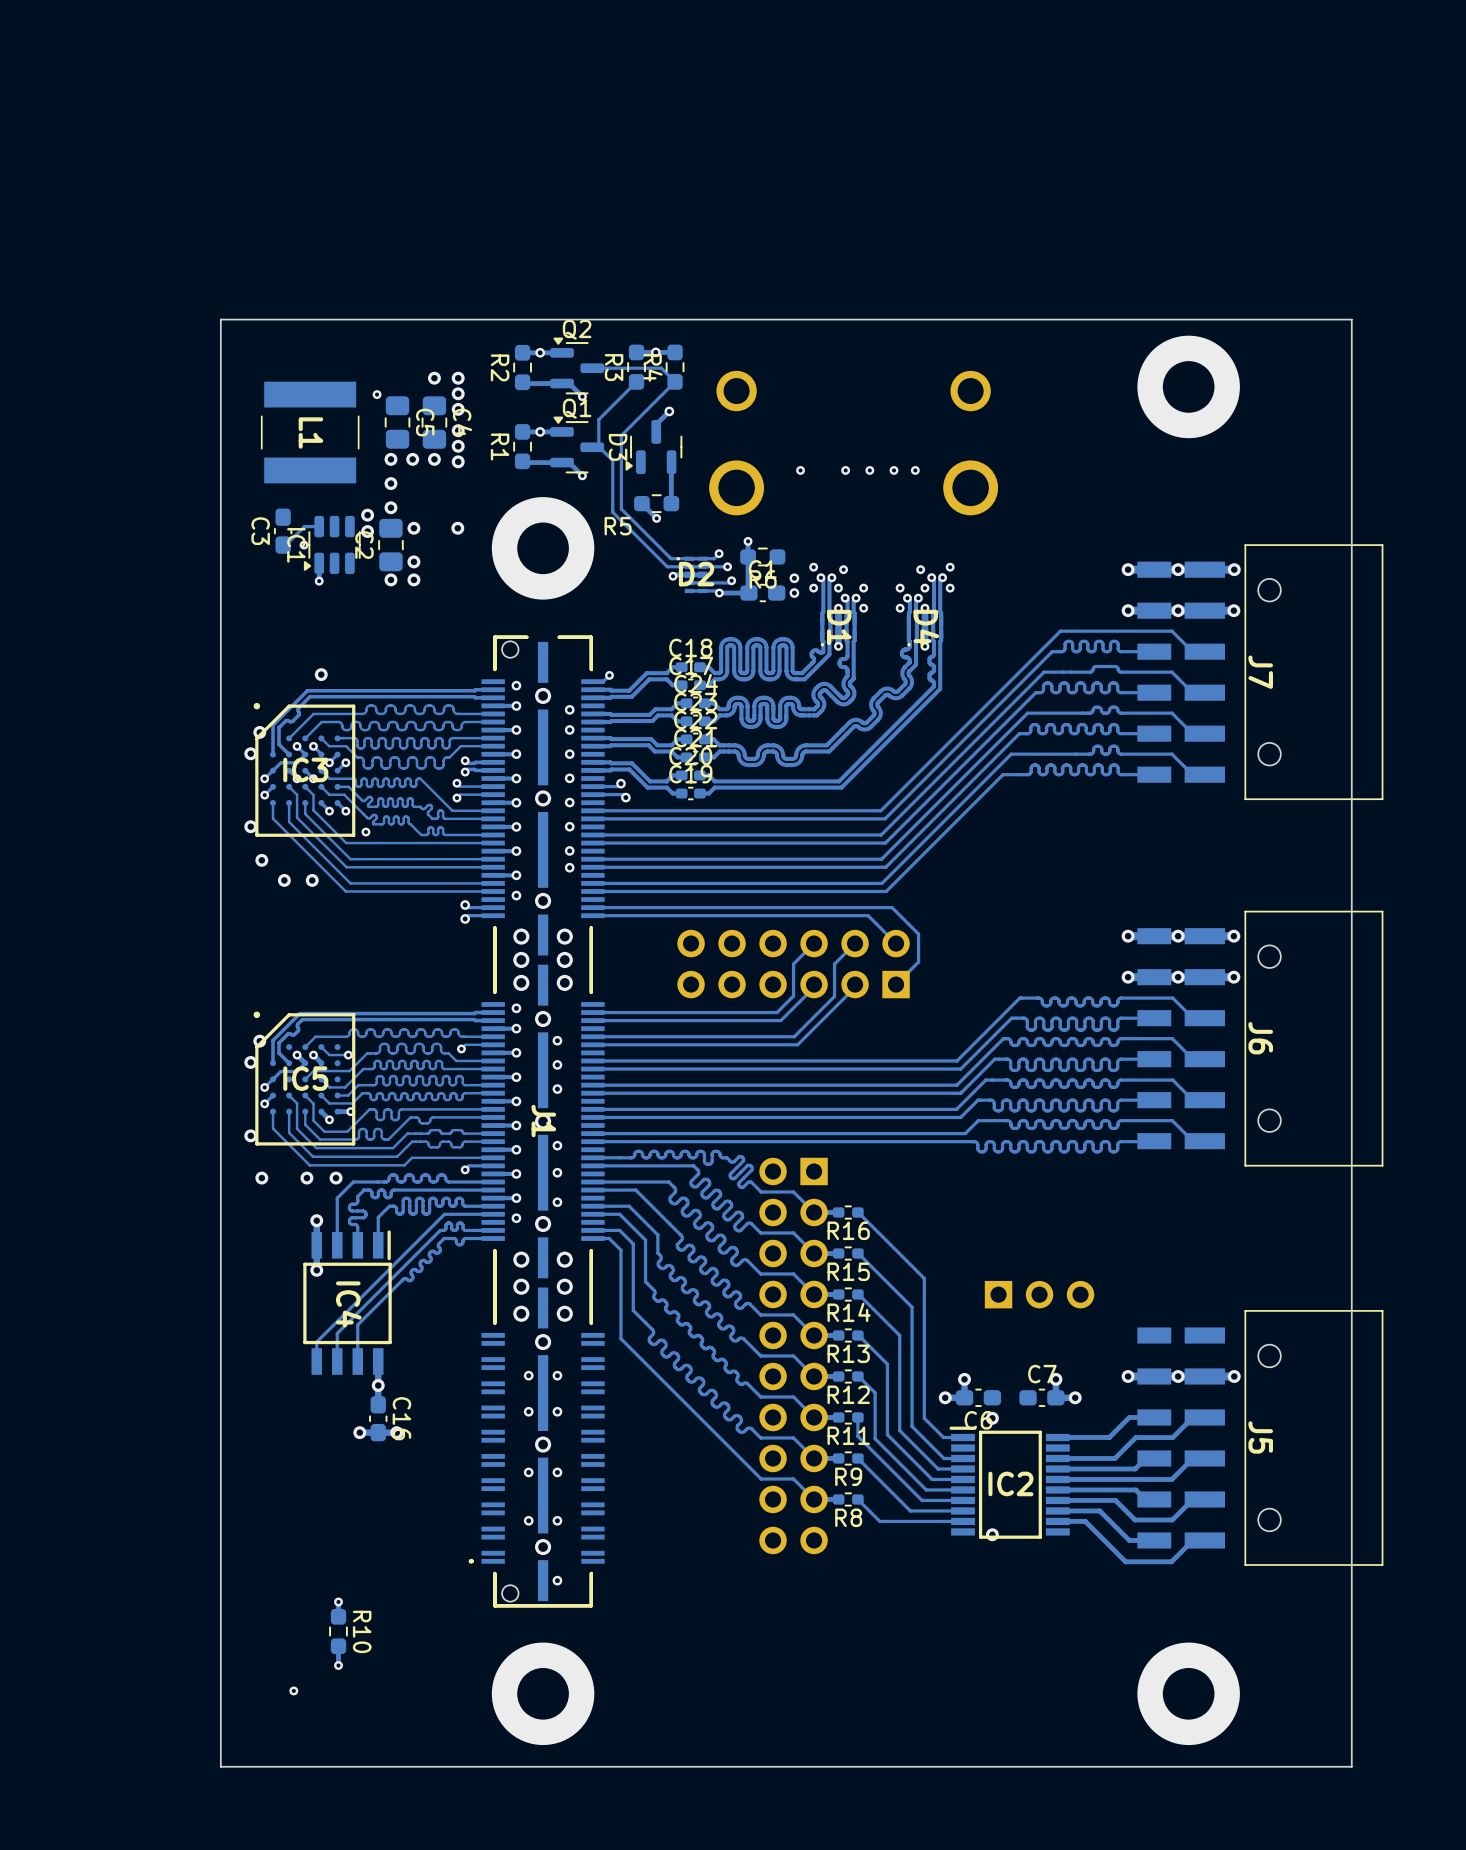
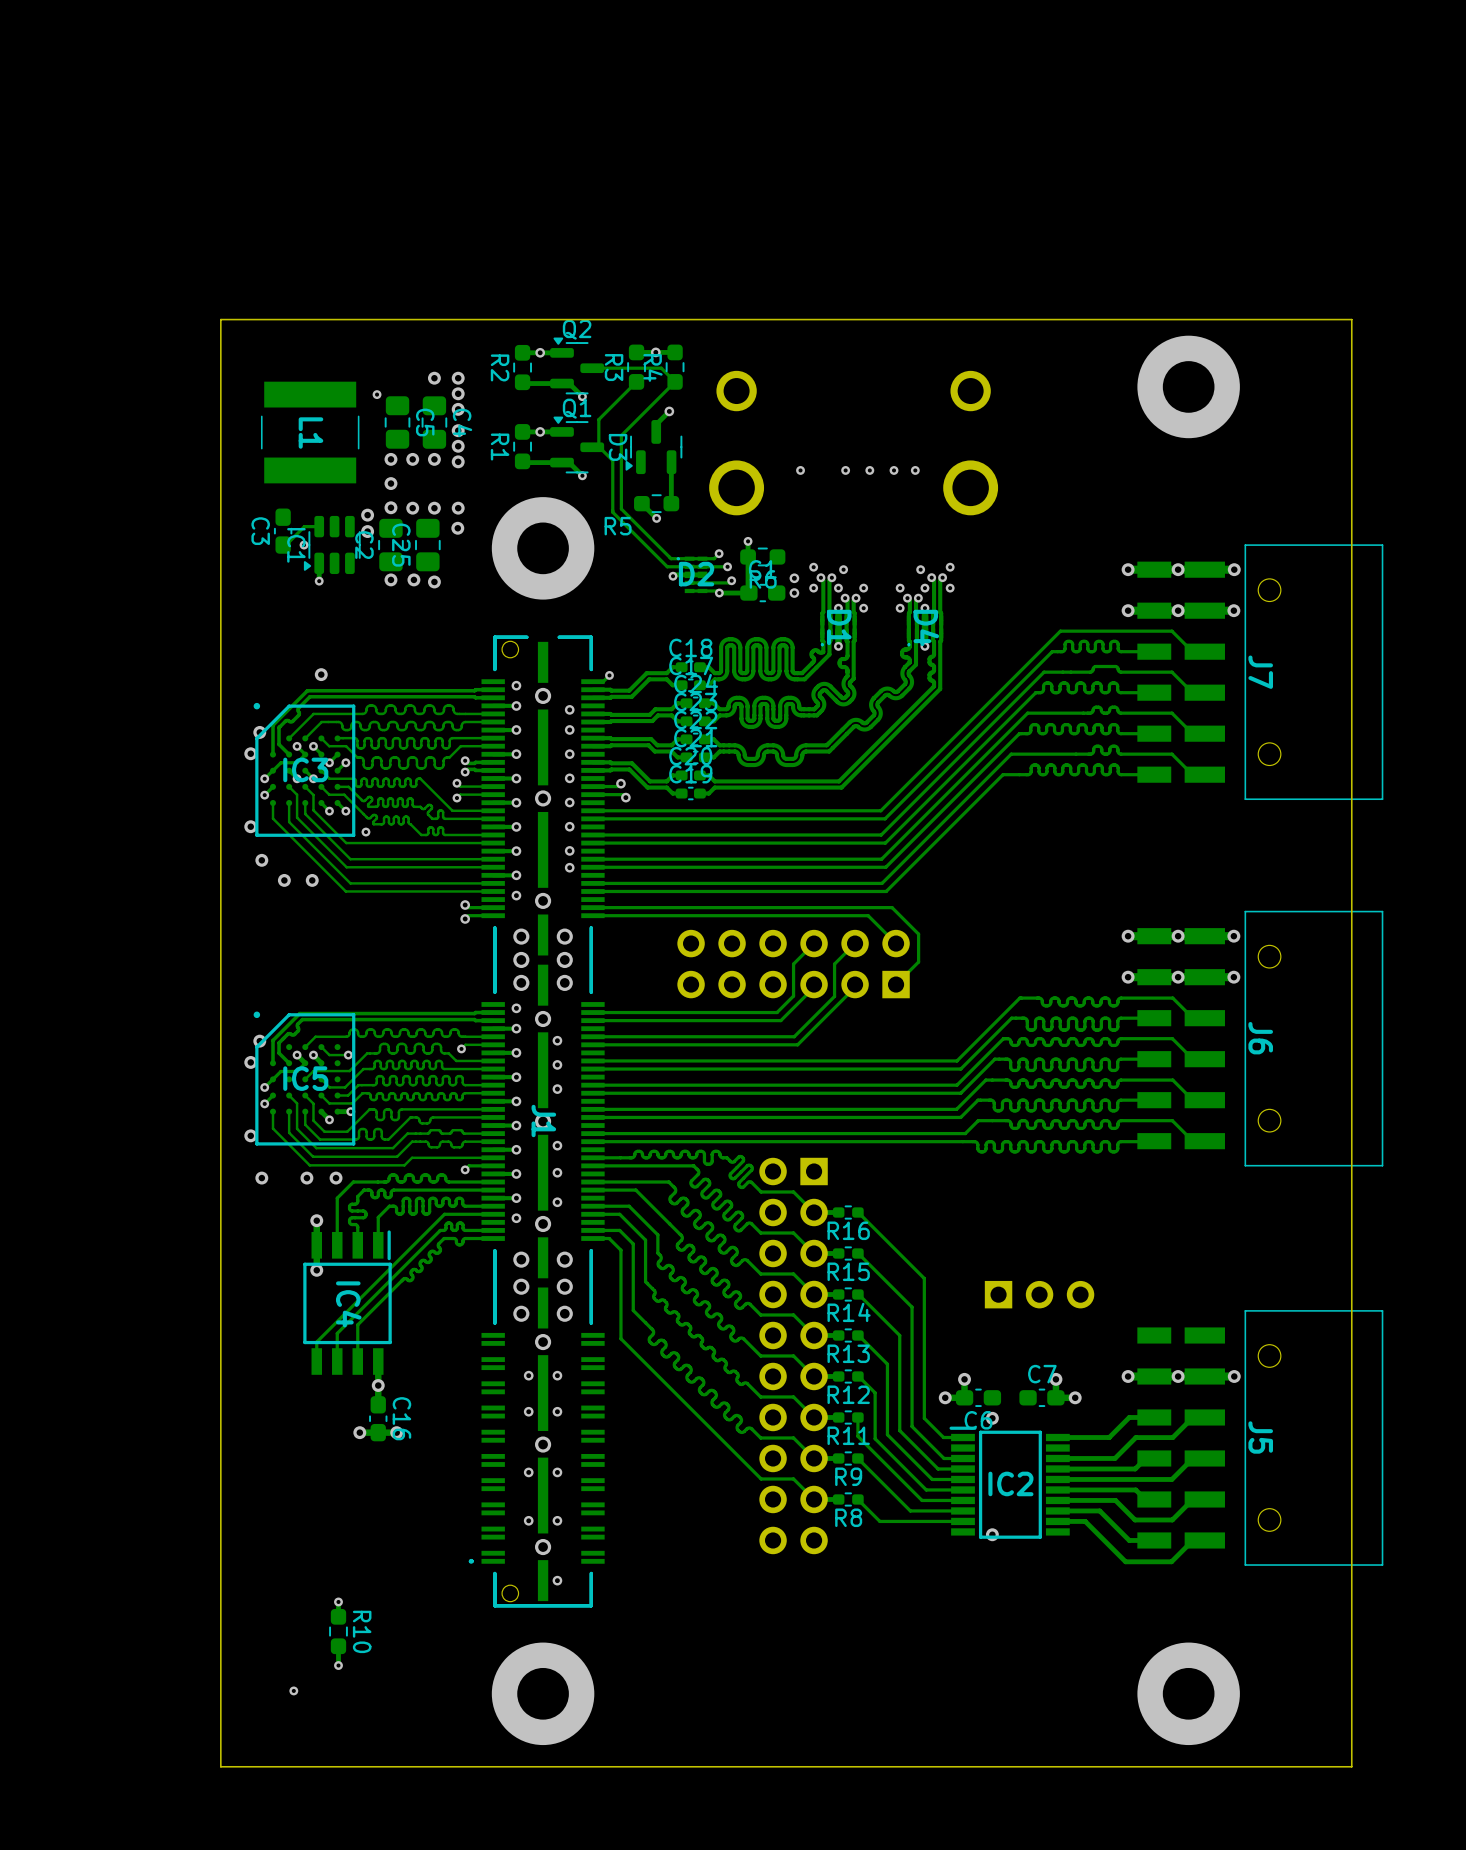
via: none -> (412, 508)
via: none -> (434, 508)
via: none -> (458, 508)
via: (413, 528) -> none
C25: none -> (427, 545)
via: (413, 561) -> none
via: none -> (434, 581)

